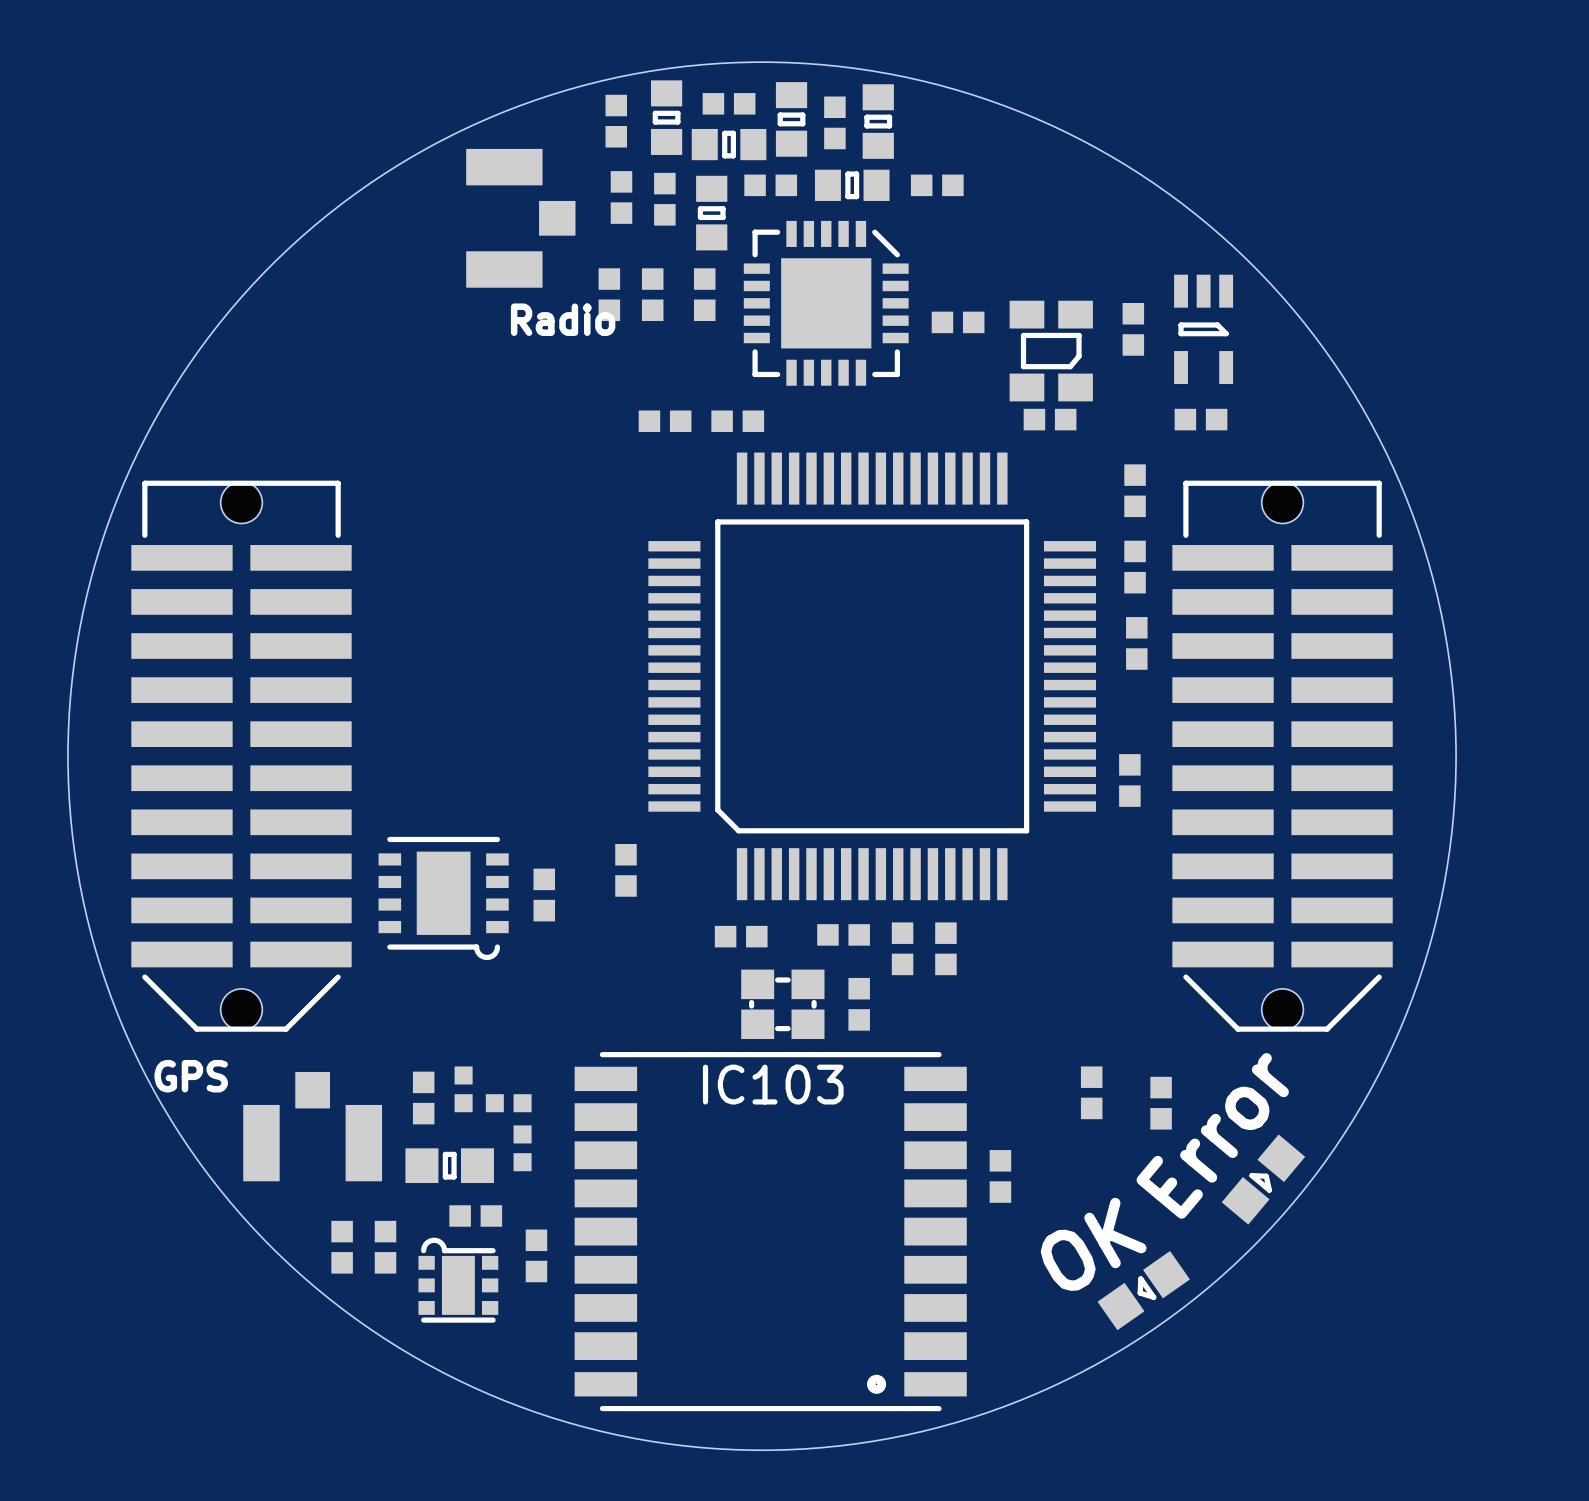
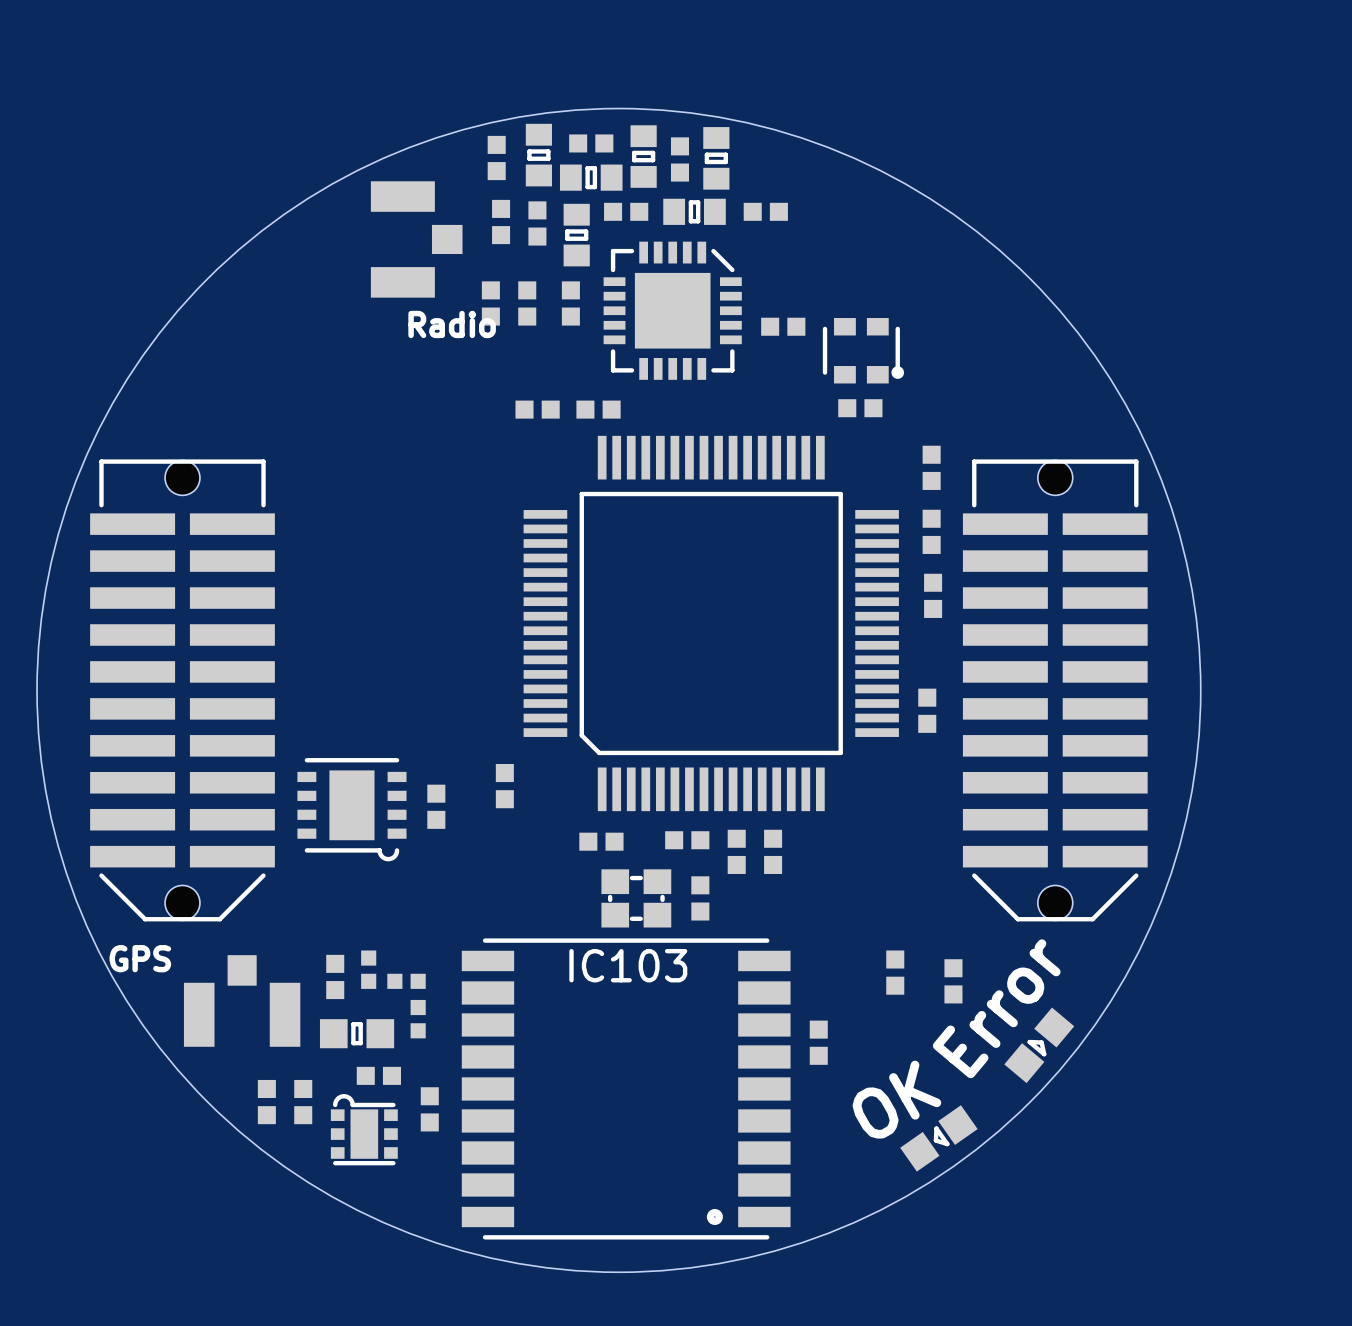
part footprint: [1009, 300, 1093, 402] -> [822, 318, 905, 384]
part: (1133, 329) -> none
part: (1203, 329) -> none
part: (1201, 419) -> none

